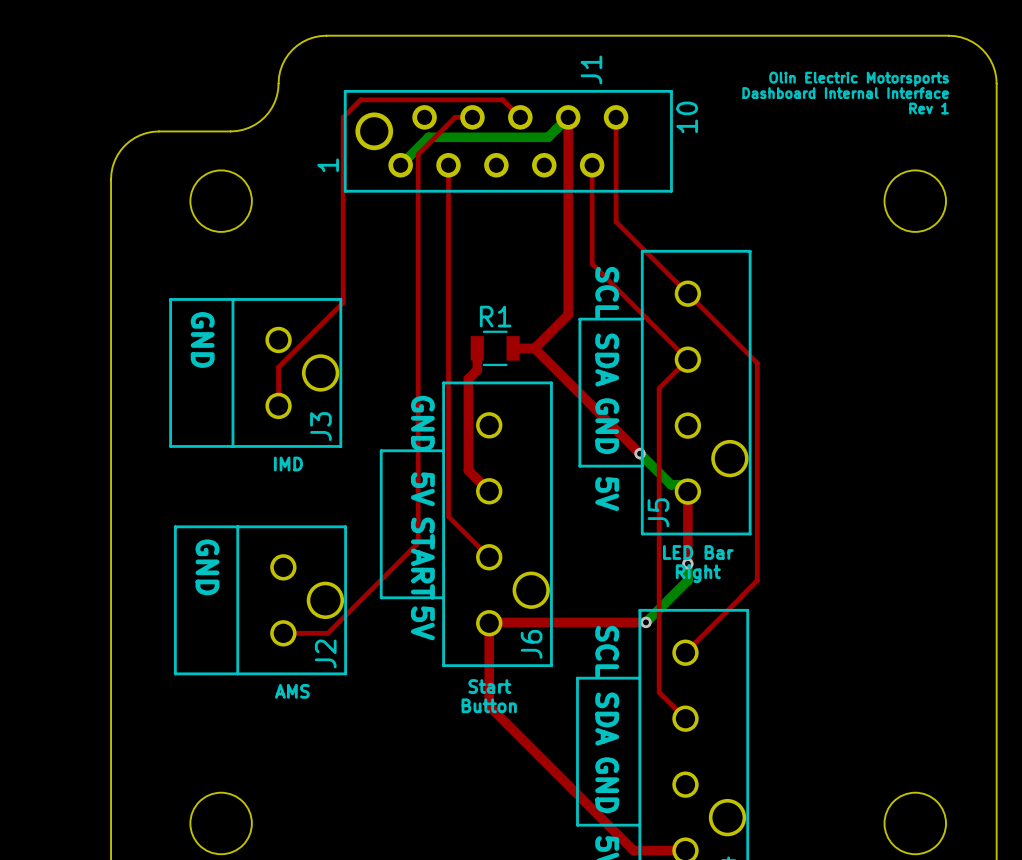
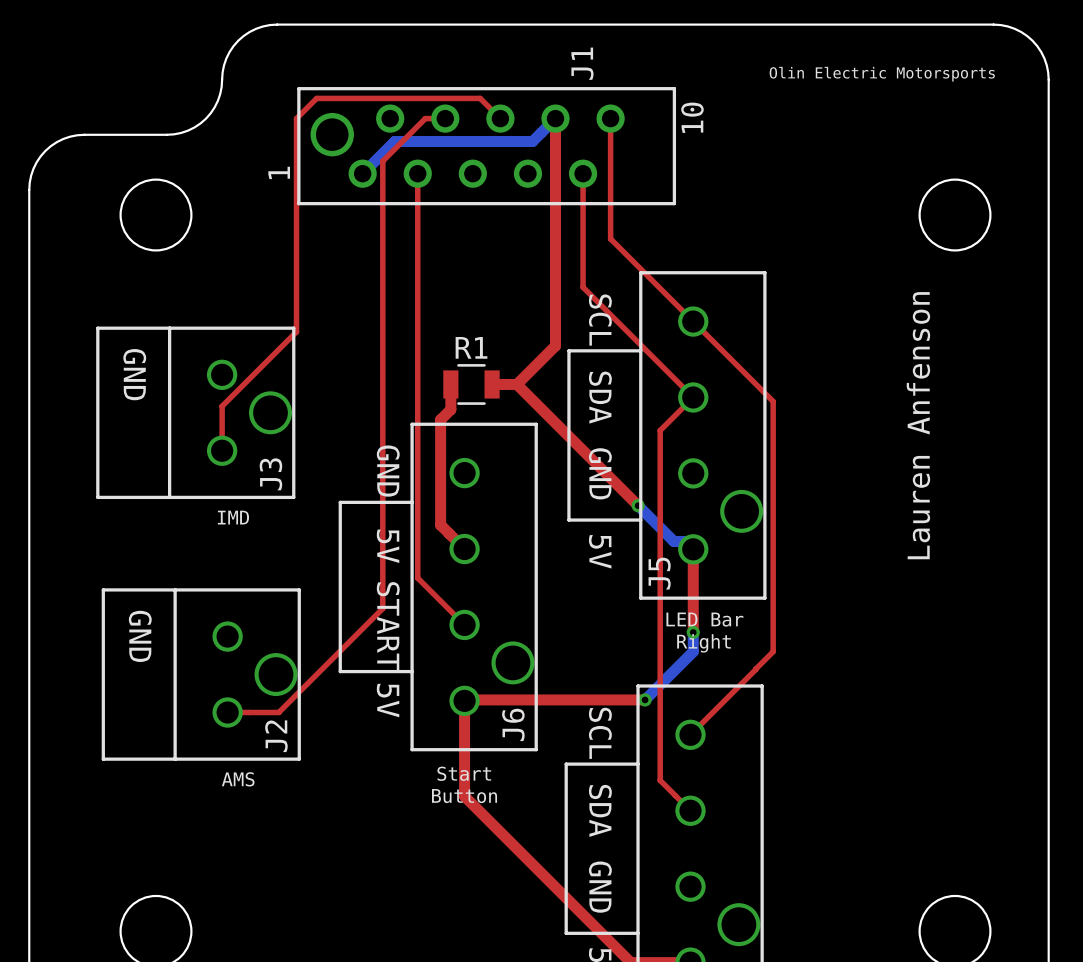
text: Dashboard Internal Interface (845, 93) -> none
text: Rev 1 (929, 108) -> none
text: none -> Lauren Anfenson (918, 425)

